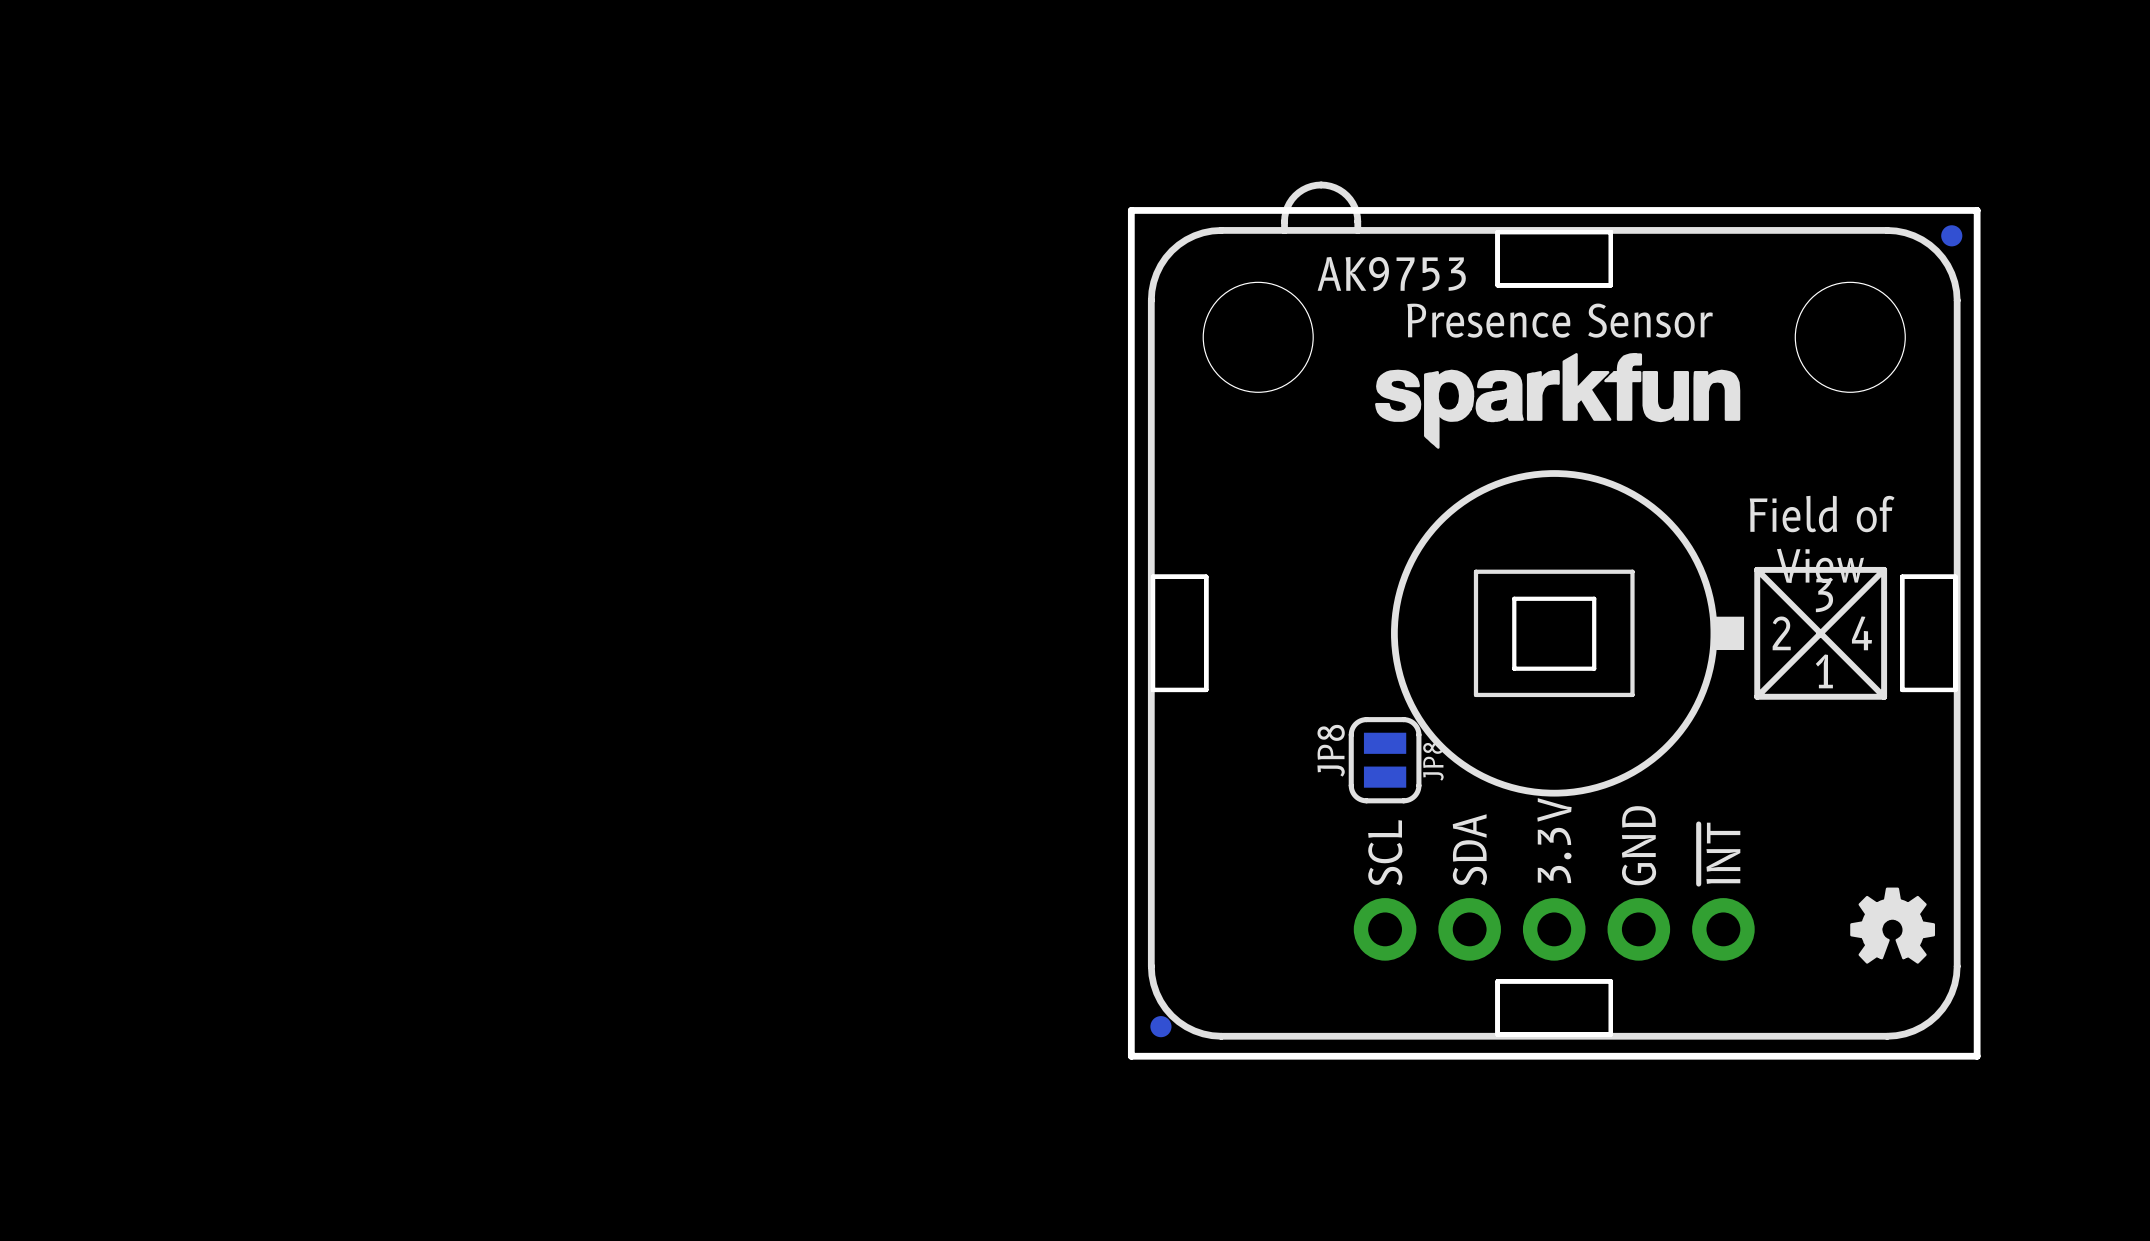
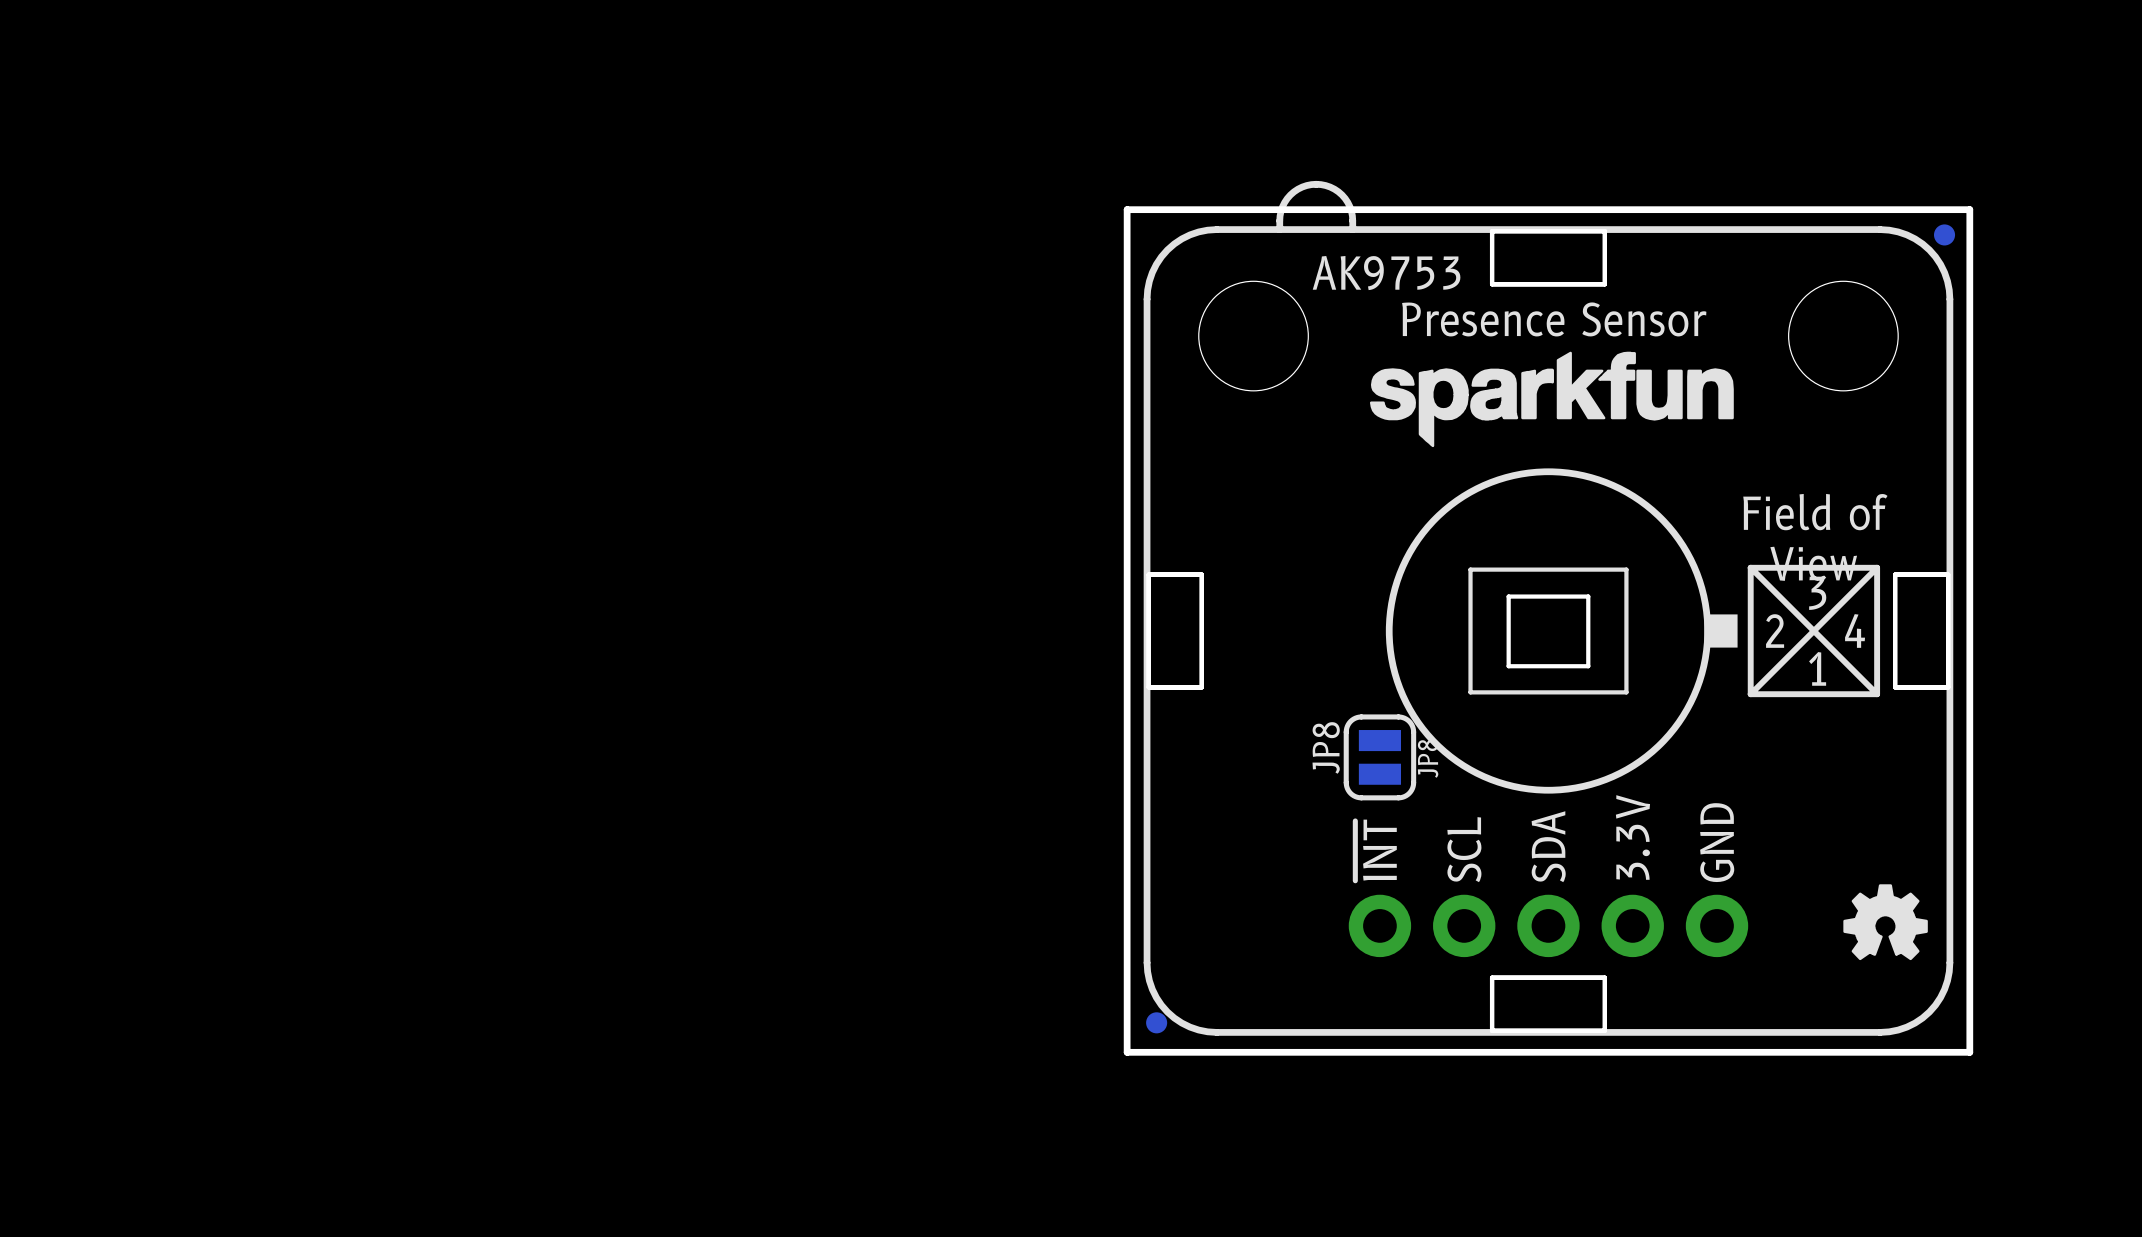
text: 3.3V (1554, 840) -> SDA (1548, 846)
text: GND (1639, 845) -> 3.3V (1632, 837)
text: SDA (1469, 849) -> SCL (1464, 849)
text: SCL (1385, 852) -> ~{INT} (1376, 850)
text: ~{INT} (1719, 853) -> GND (1717, 842)

